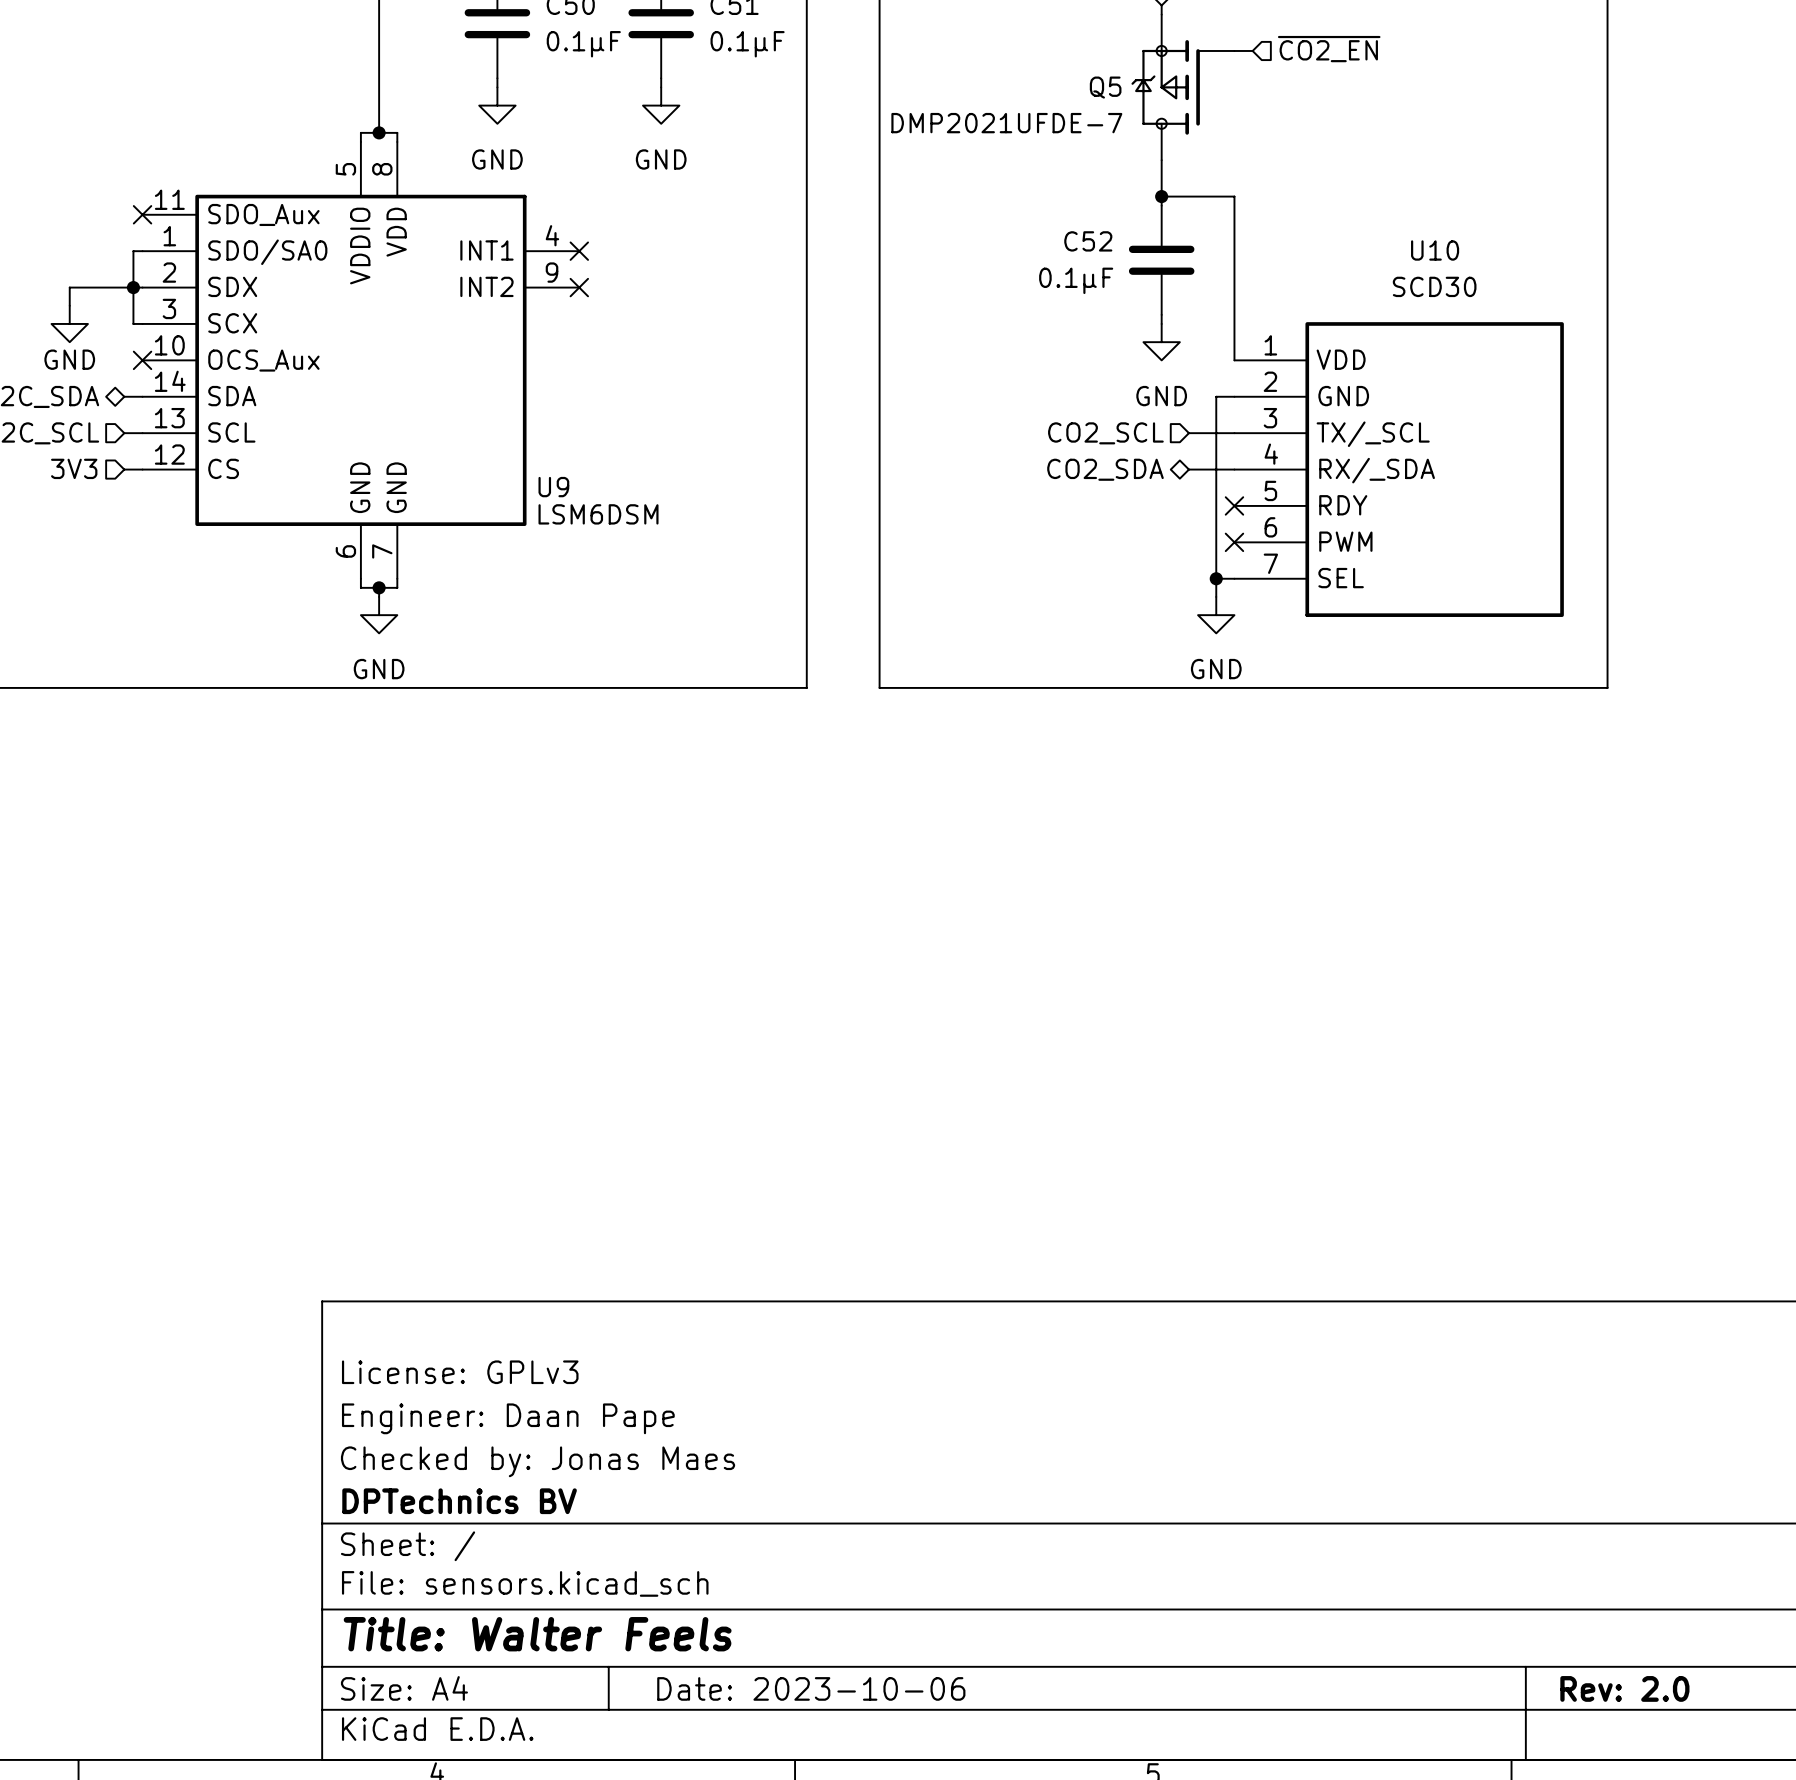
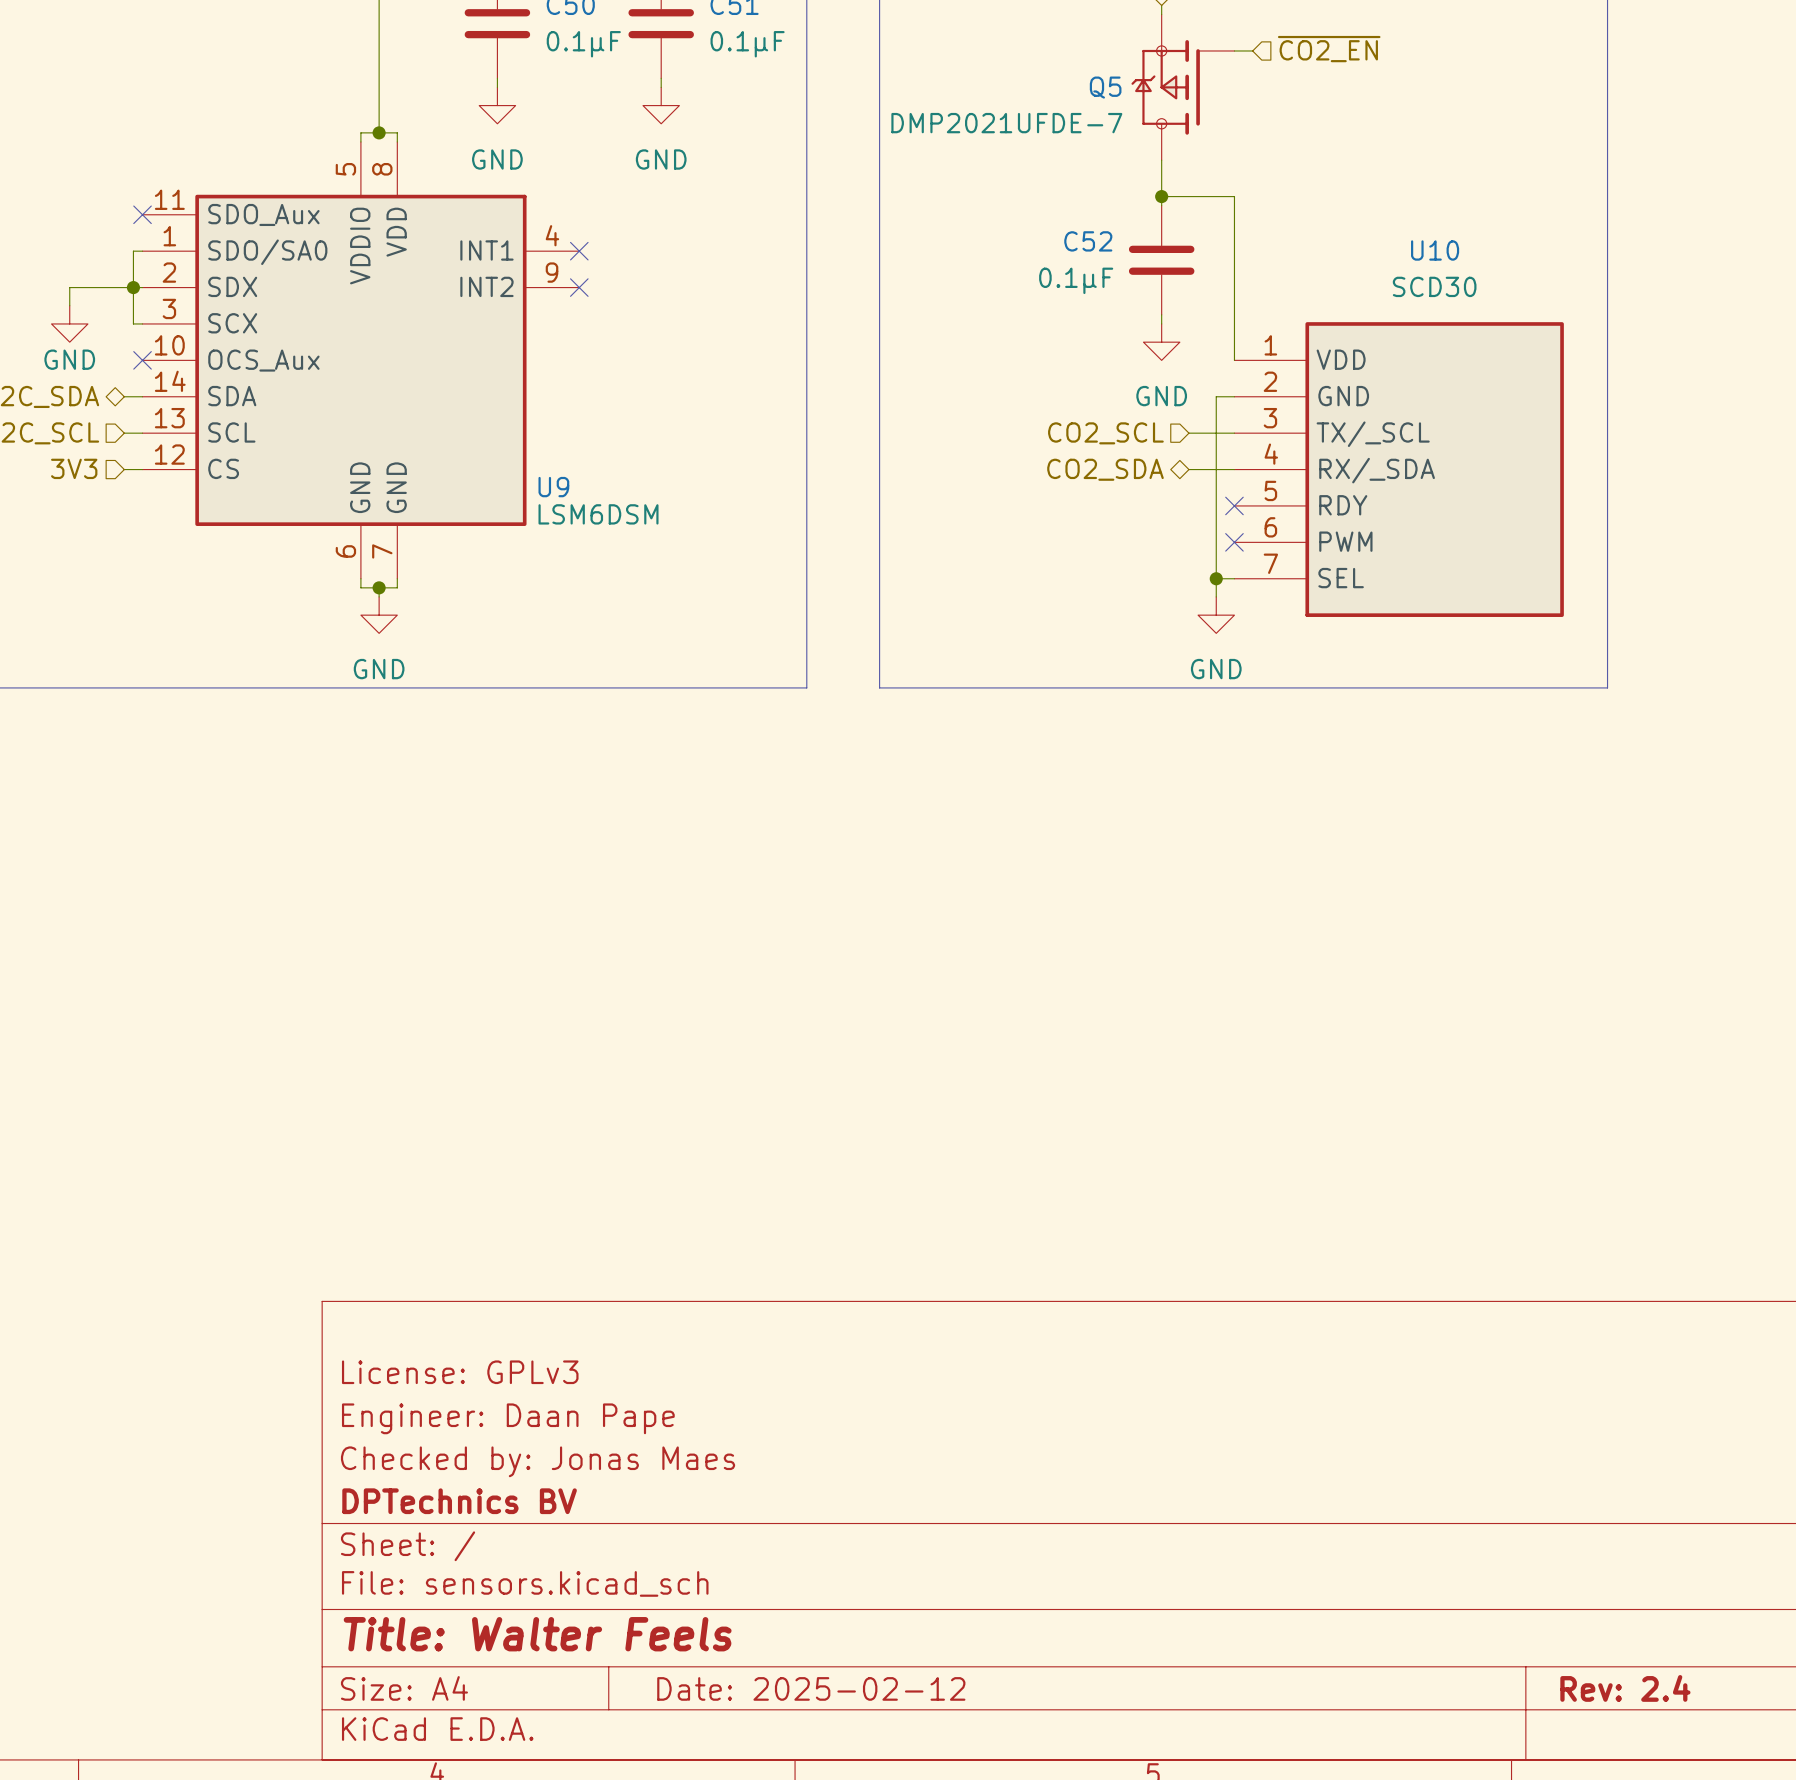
title block: Date: 2023-10-06 (811, 1688) -> Date: 2025-02-12 (811, 1688)
title block: Rev: 2.0 (1624, 1688) -> Rev: 2.4 (1625, 1688)

